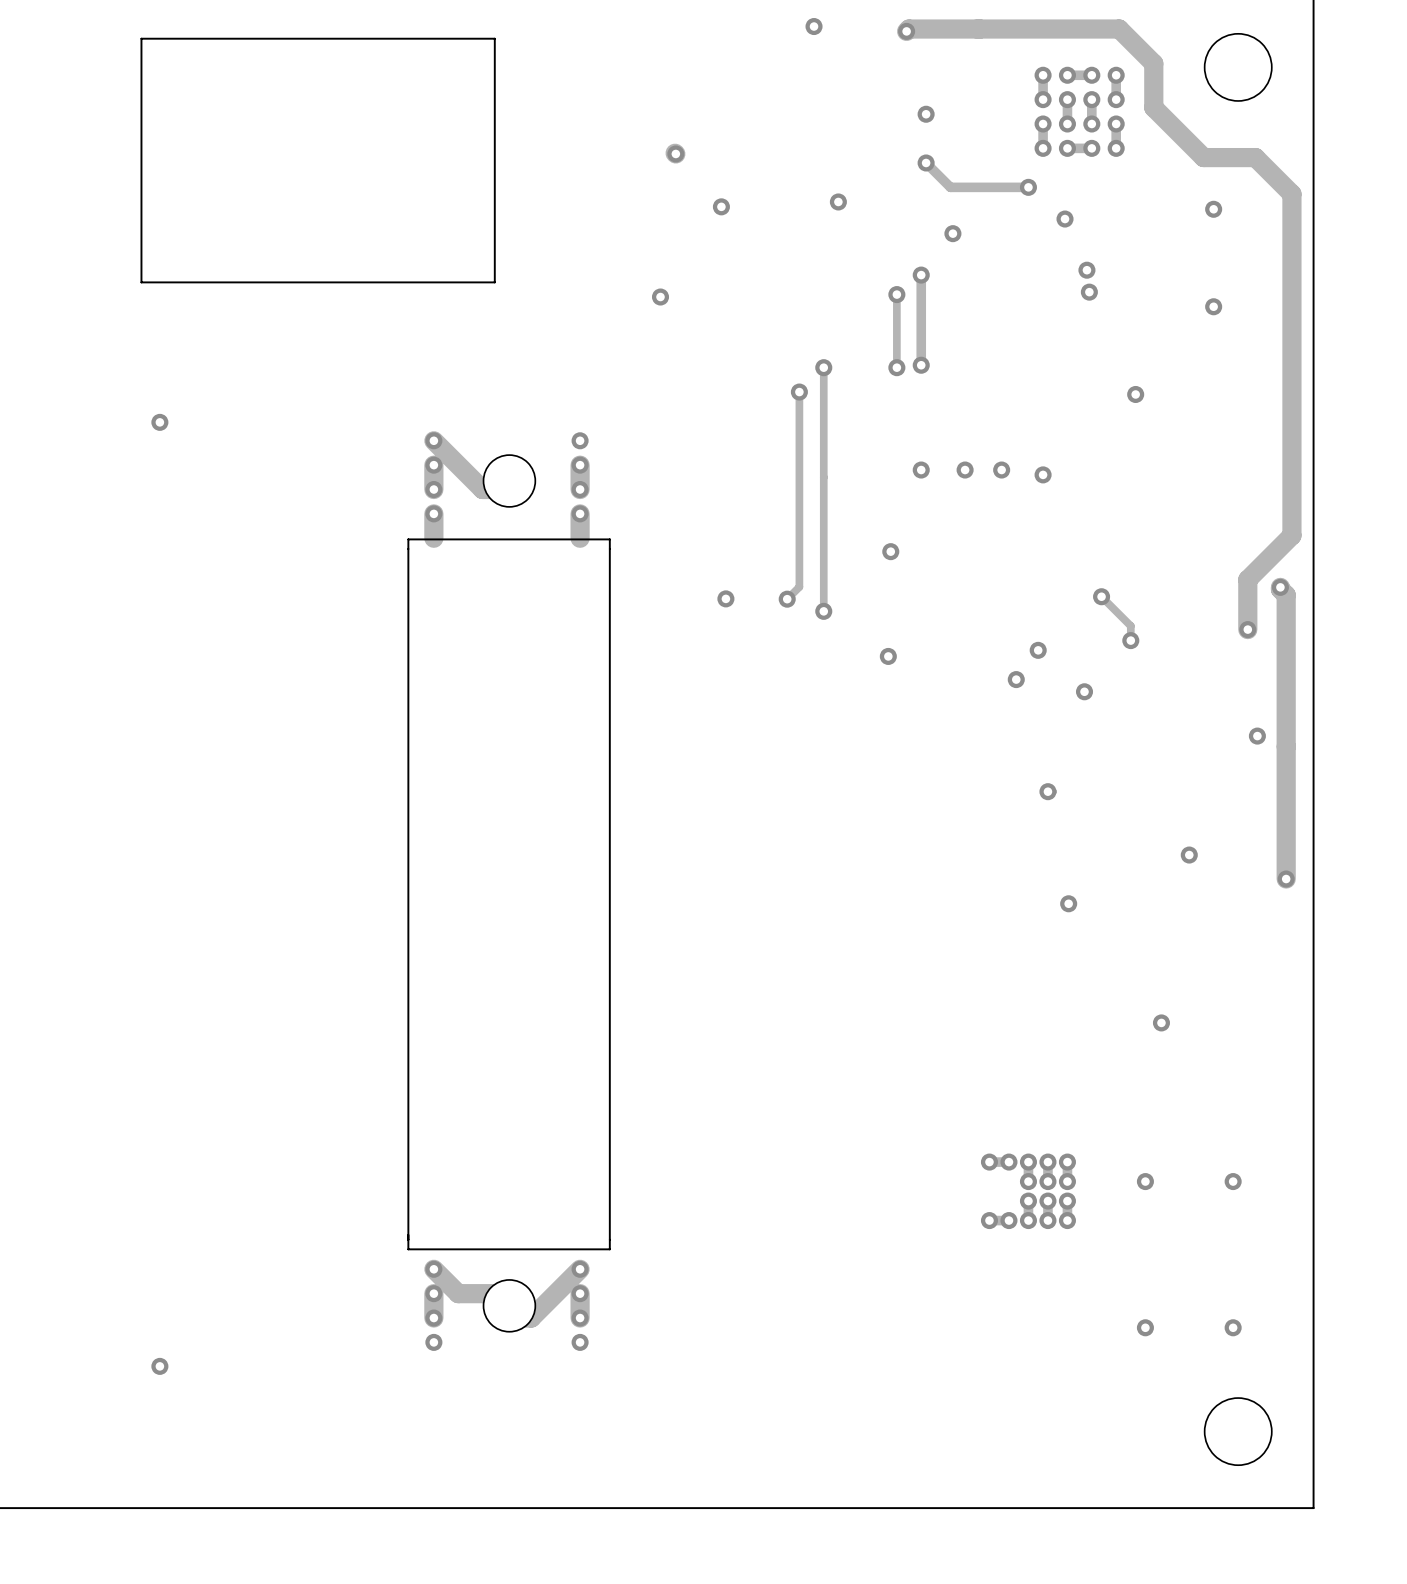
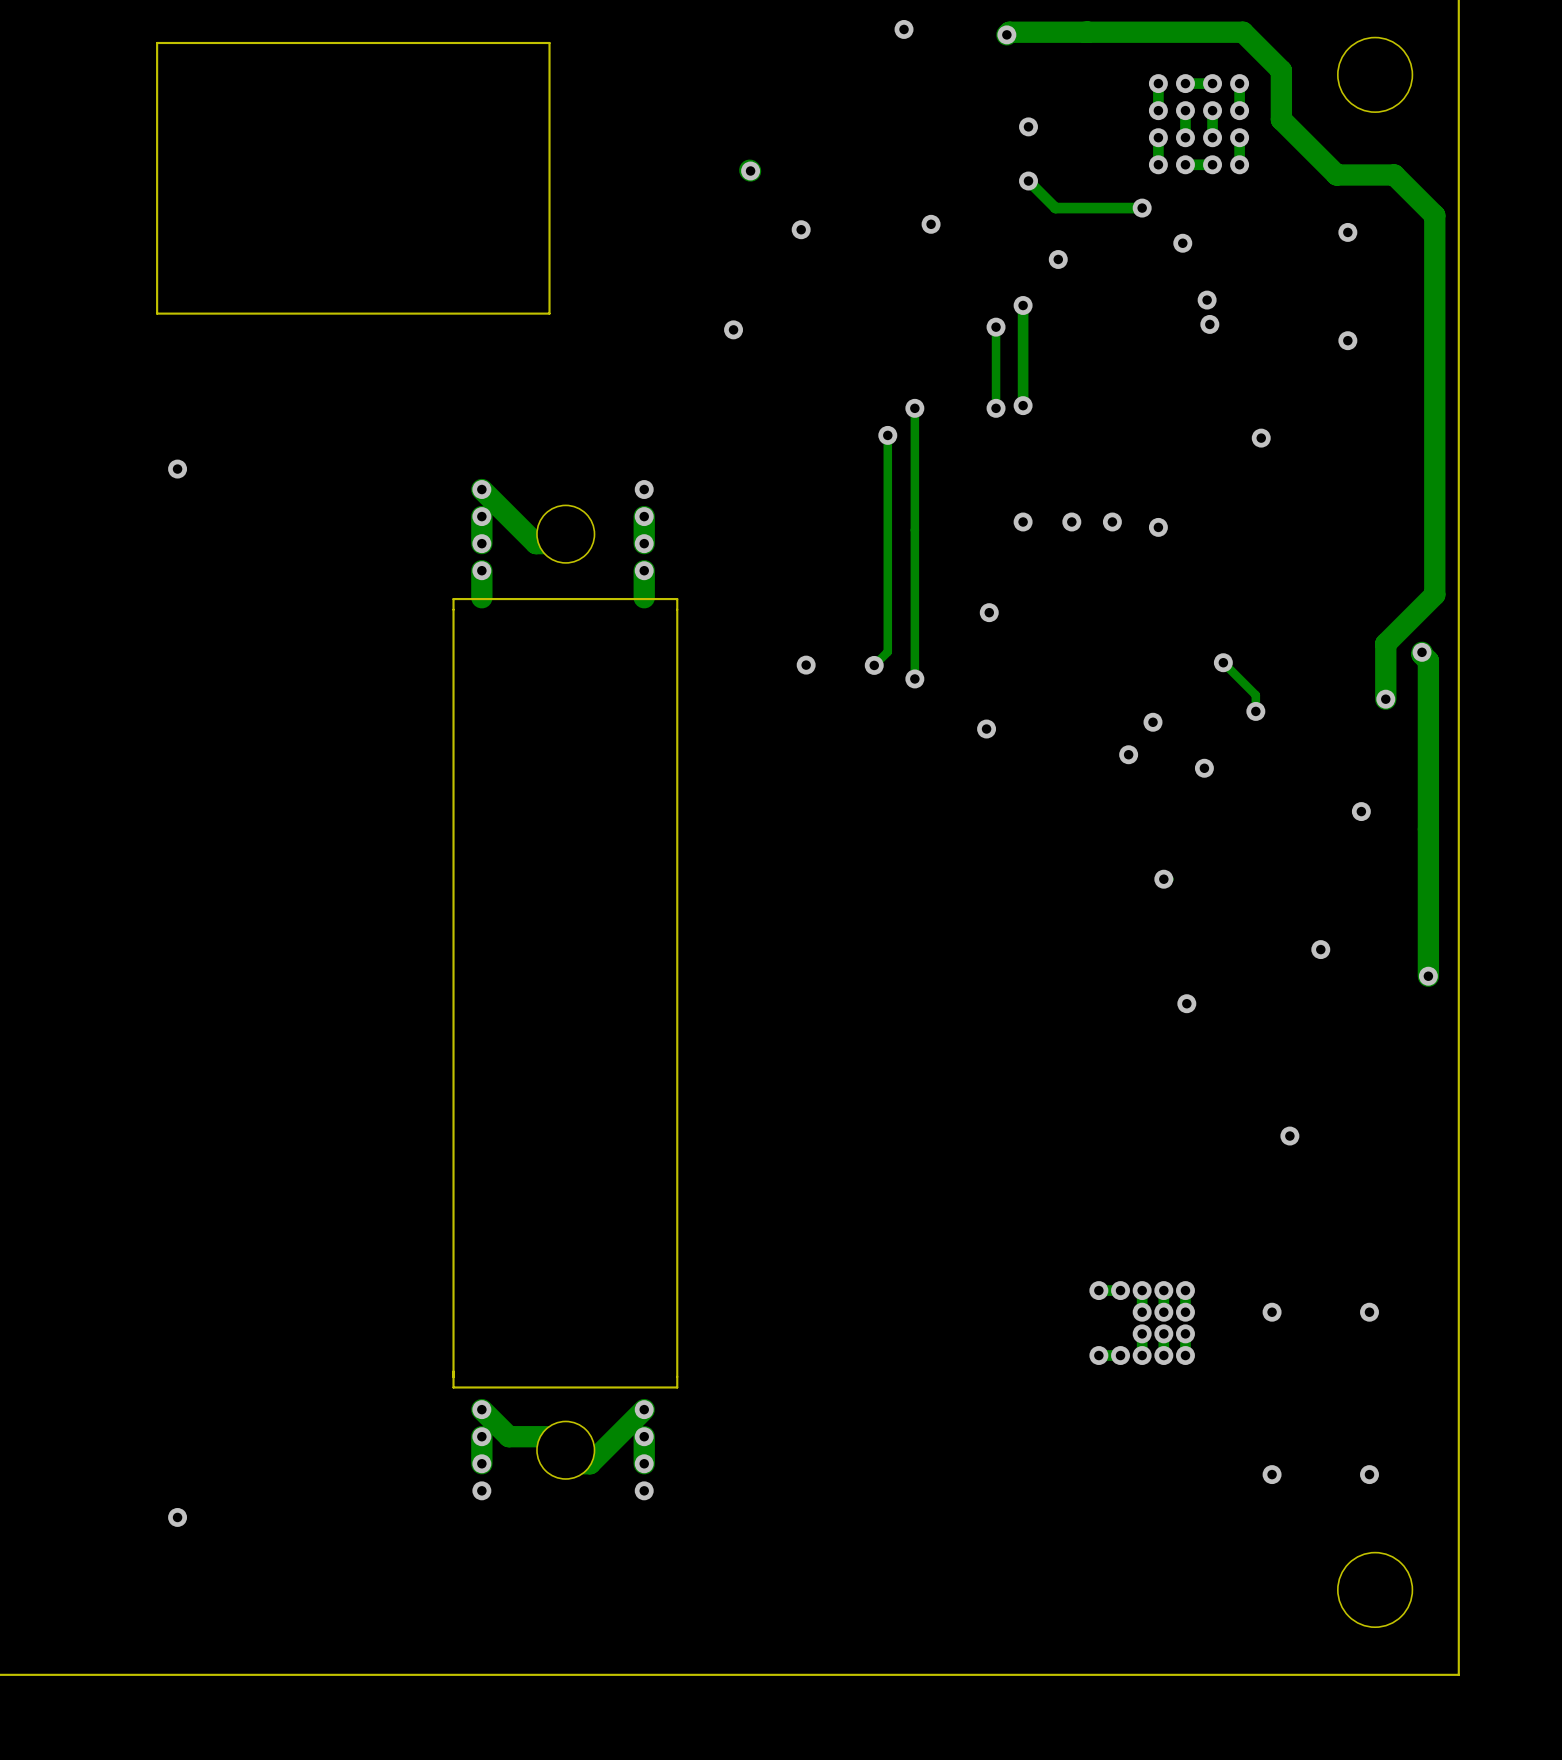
via position: (1257, 736) -> (1361, 811)

